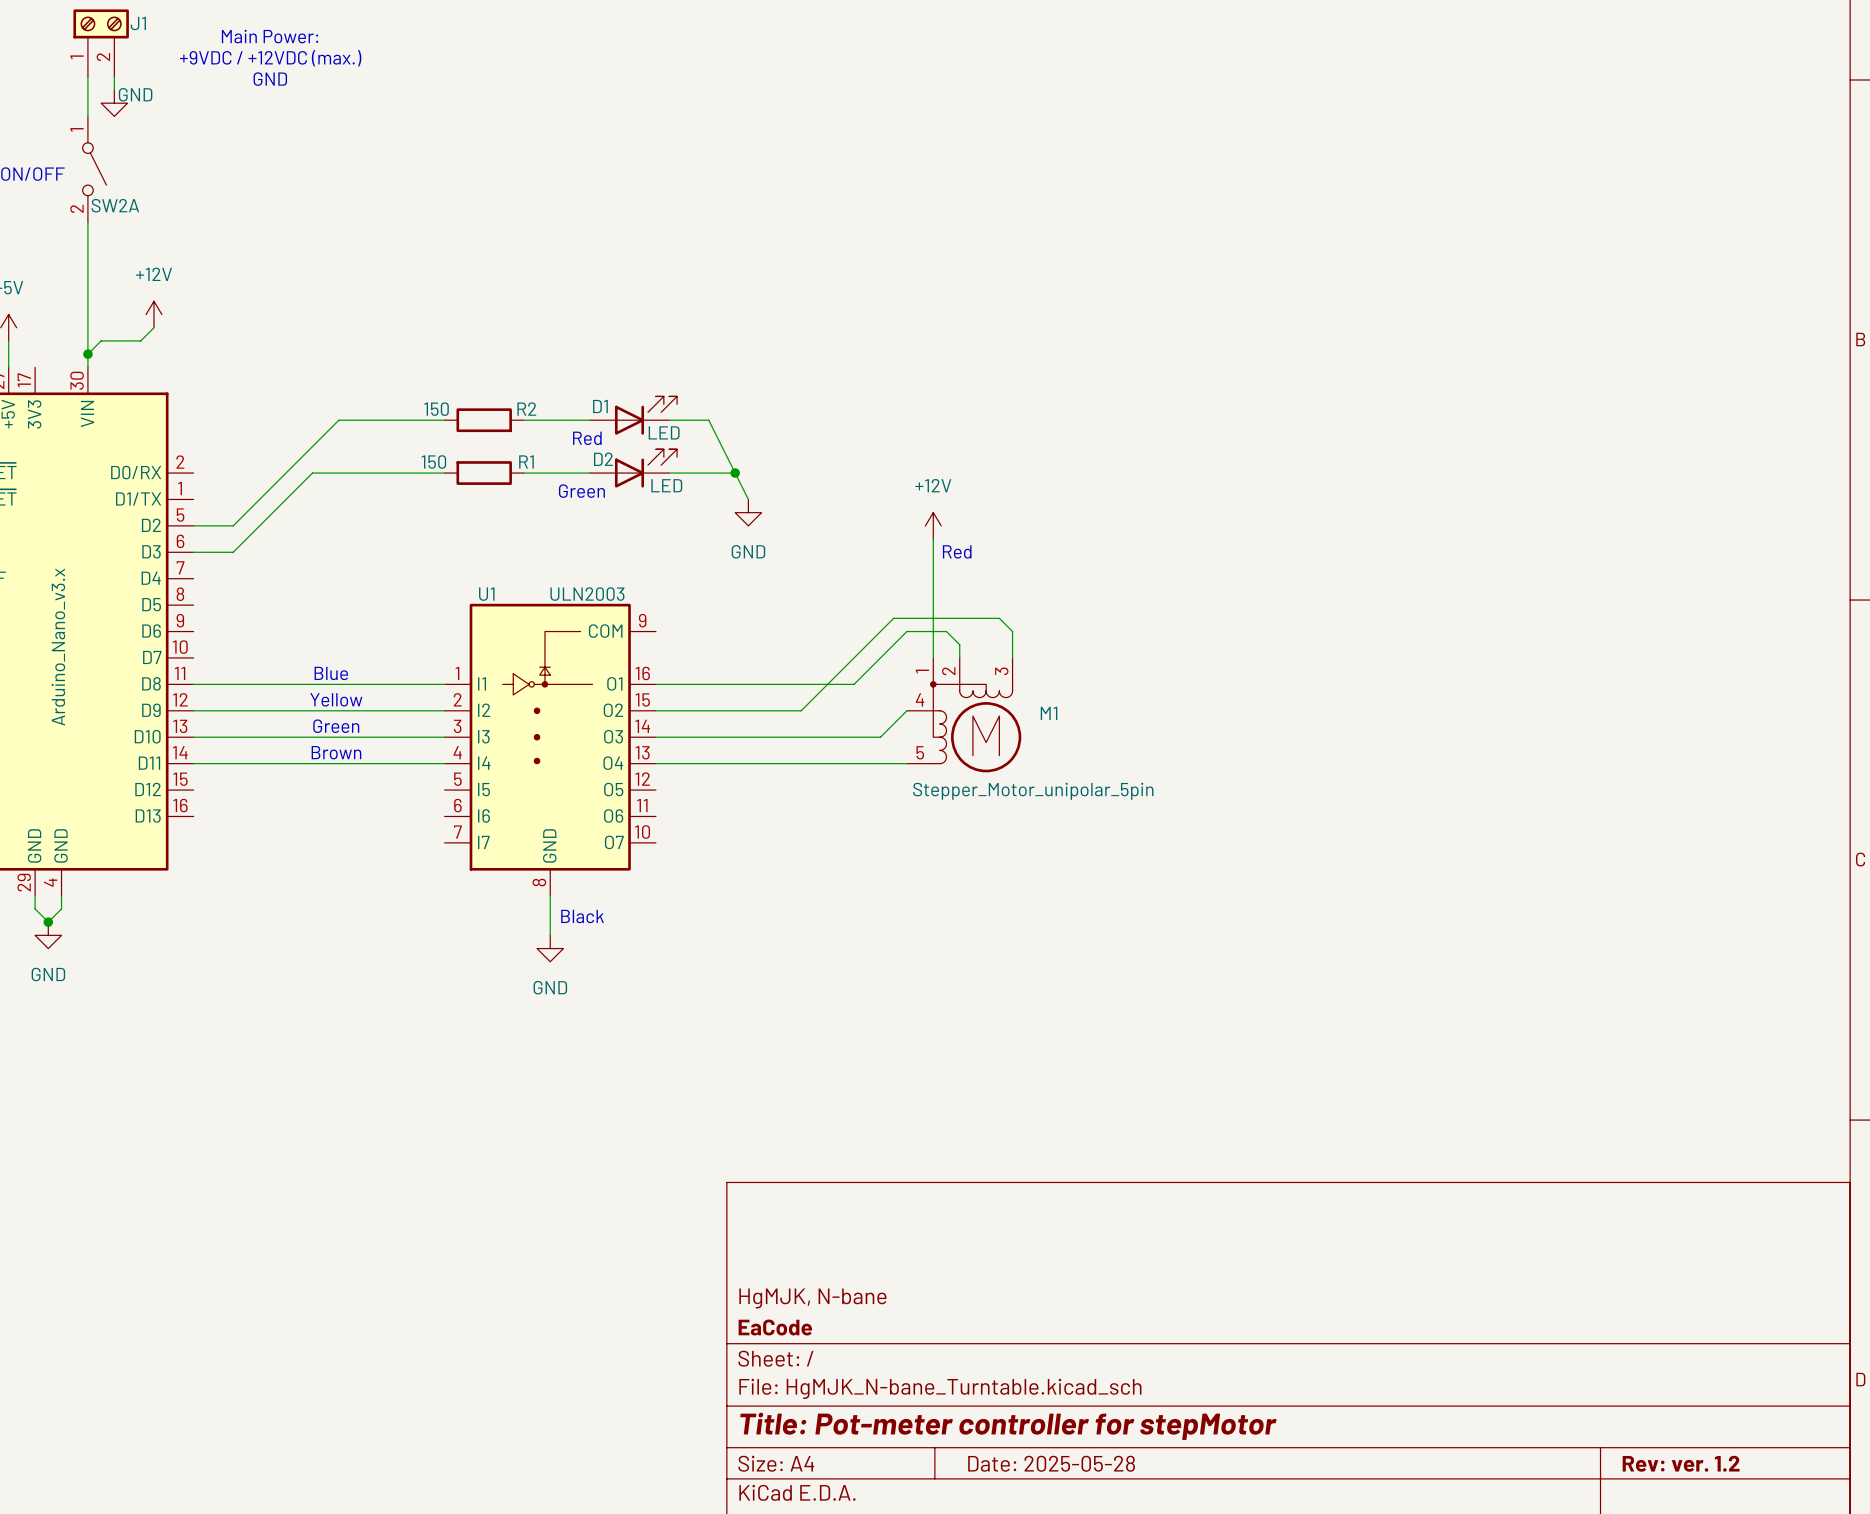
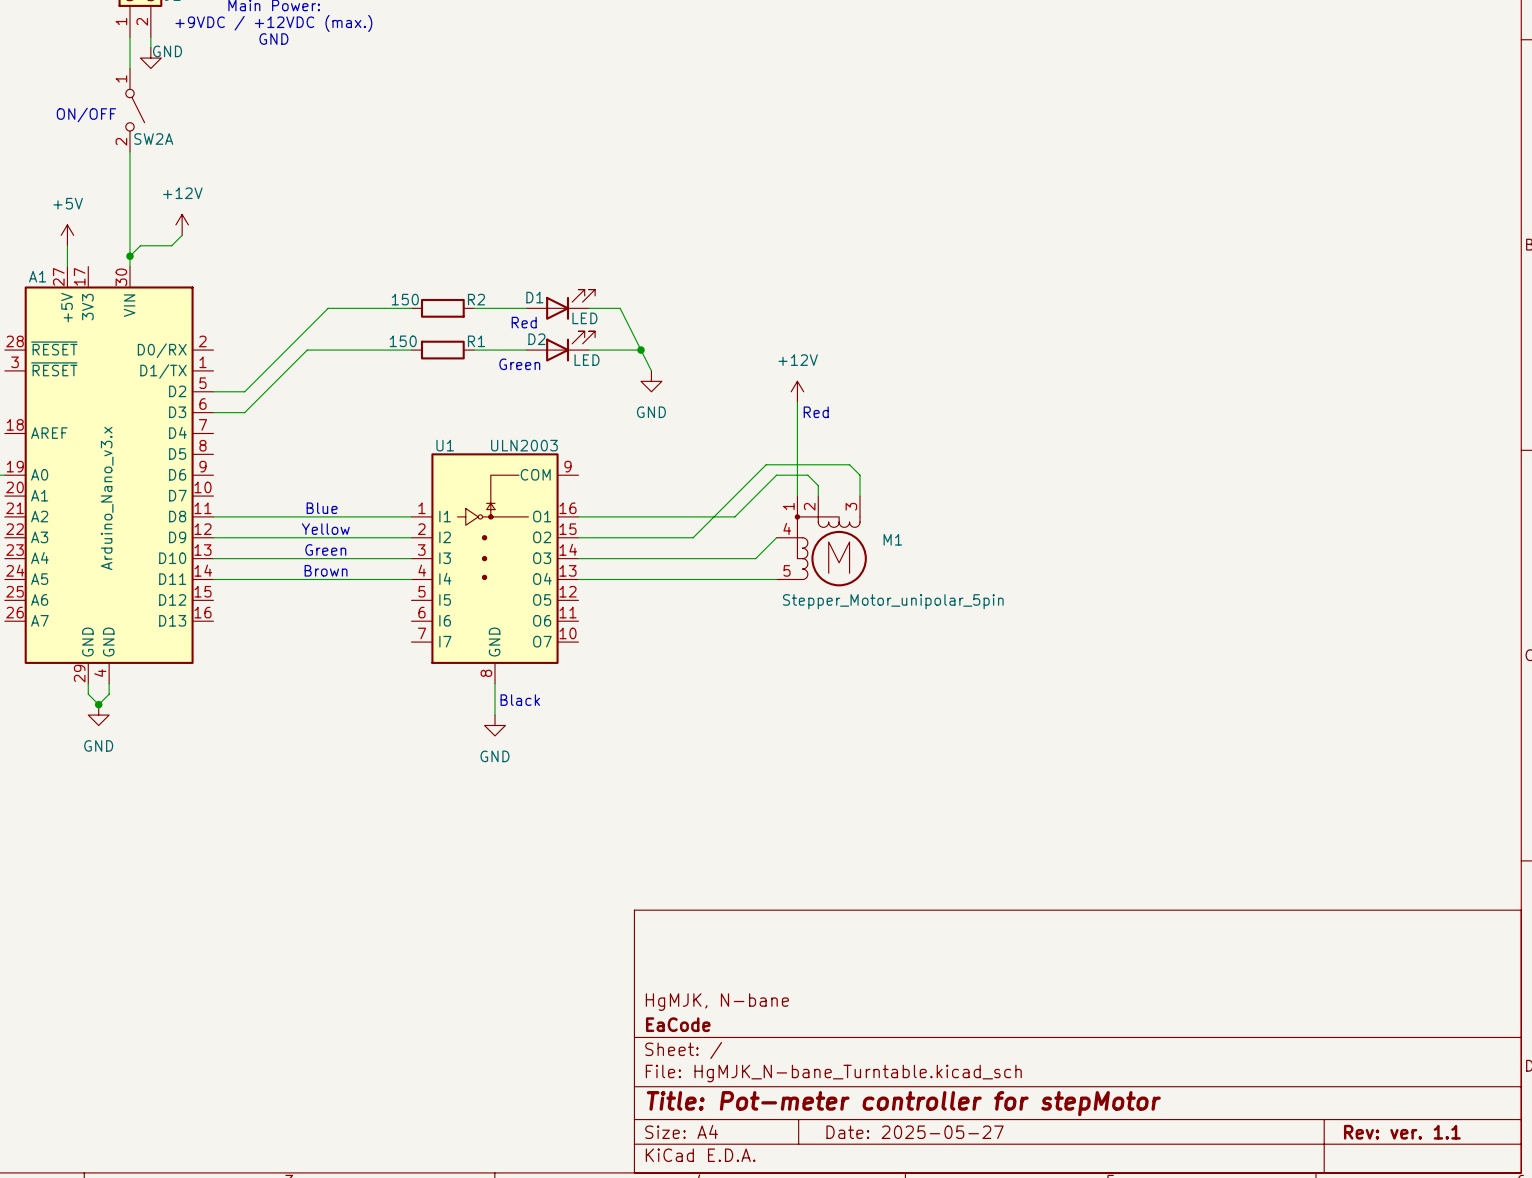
title block: Date: 2025-05-28 (1051, 1463) -> Date: 2025-05-27 (915, 1132)
title block: Rev: ver. 1.2 (1681, 1463) -> Rev: ver. 1.1 (1402, 1132)

